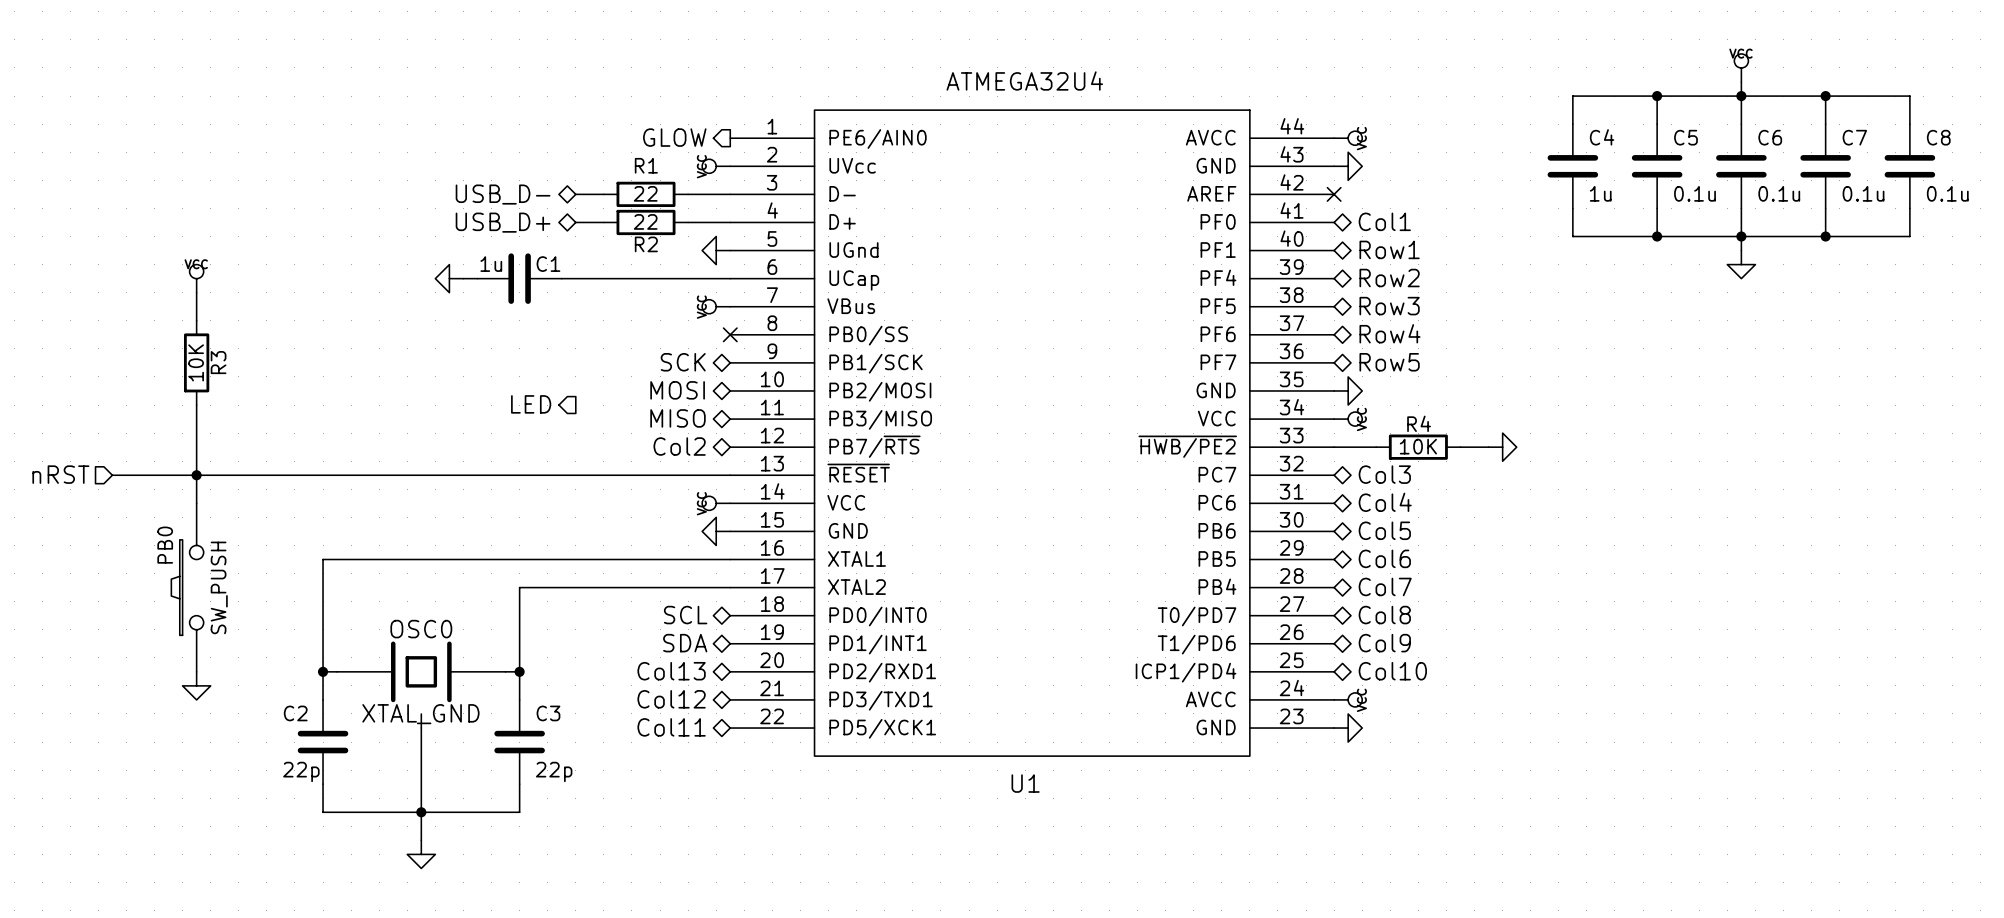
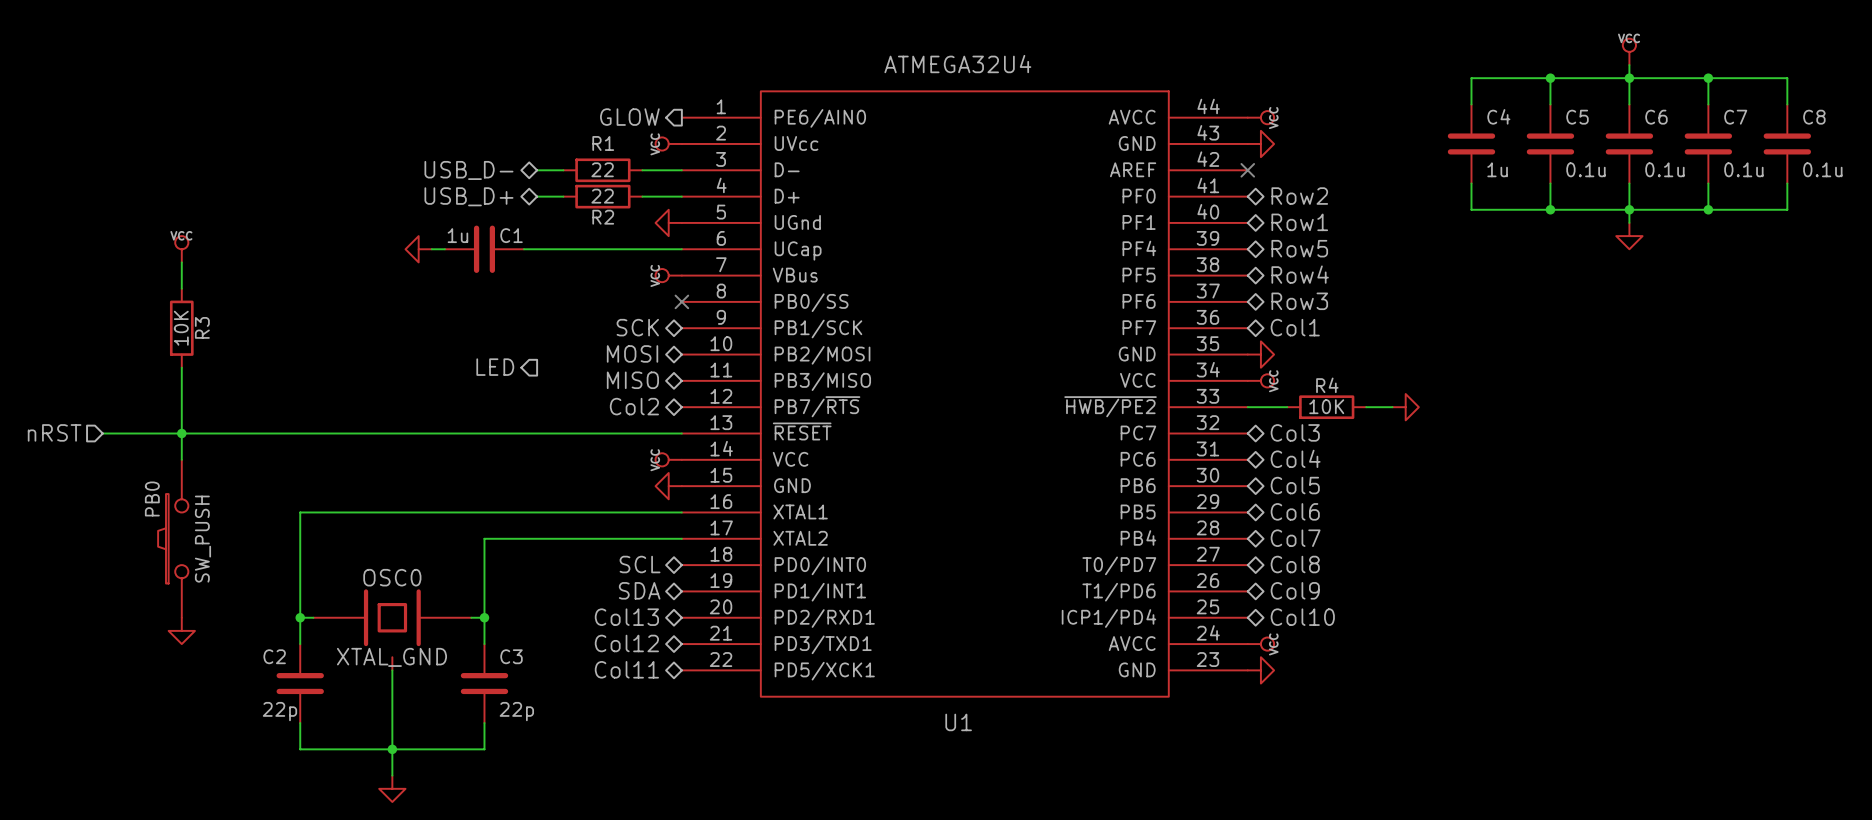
hierarchical label: Col1 (1384, 221) -> Row2 (1299, 196)
hierarchical label: Row2 (1389, 278) -> Row5 (1299, 248)
hierarchical label: Row3 (1389, 306) -> Row4 (1300, 274)
hierarchical label: Row4 (1390, 333) -> Row3 (1299, 301)
hierarchical label: Row5 (1389, 362) -> Col1 (1295, 327)

